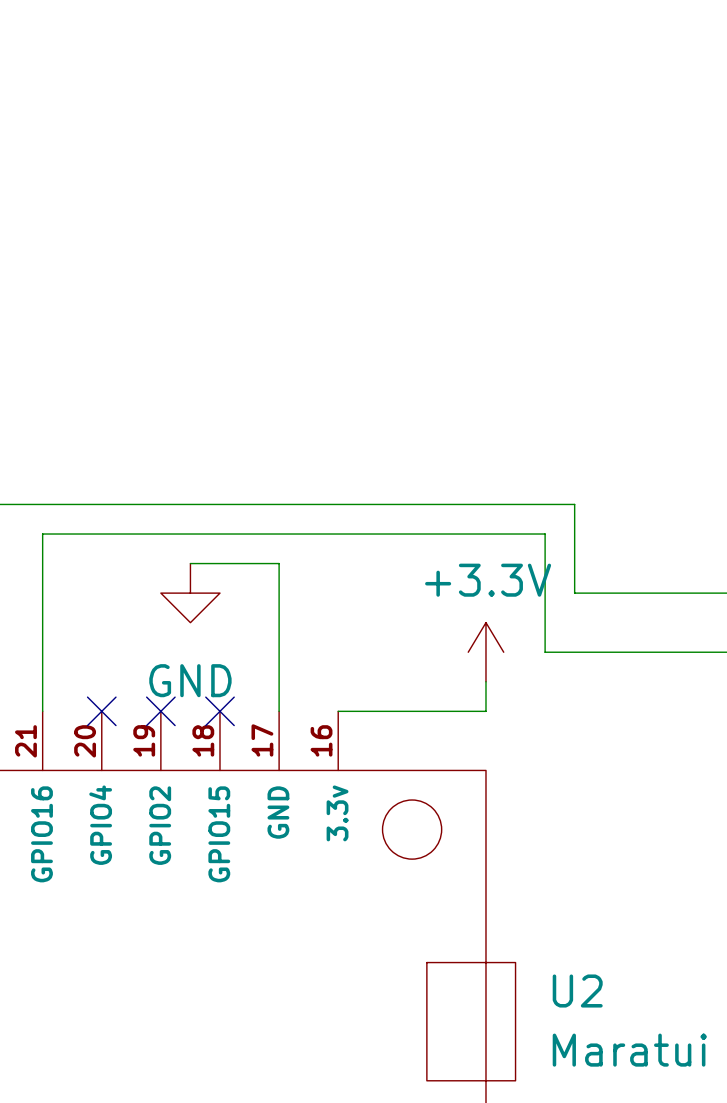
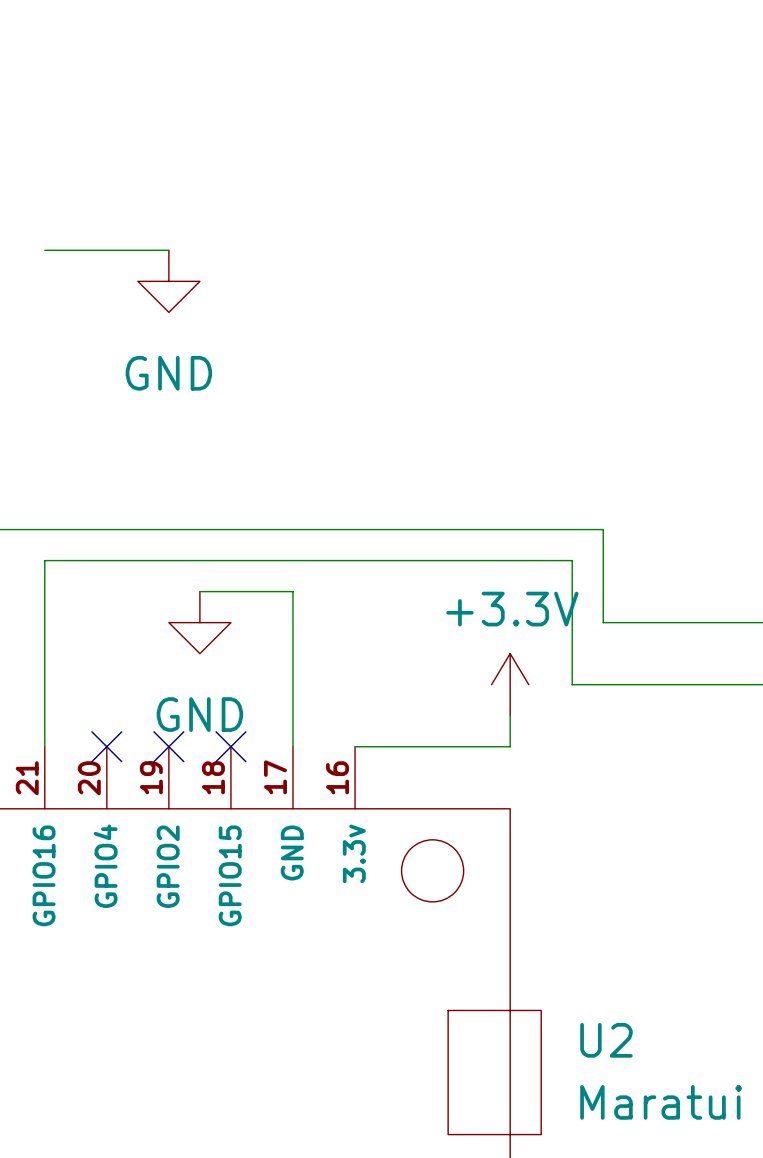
wire: none -> (44, 250) (168, 250)
power symbol: none -> GND (168, 281)

